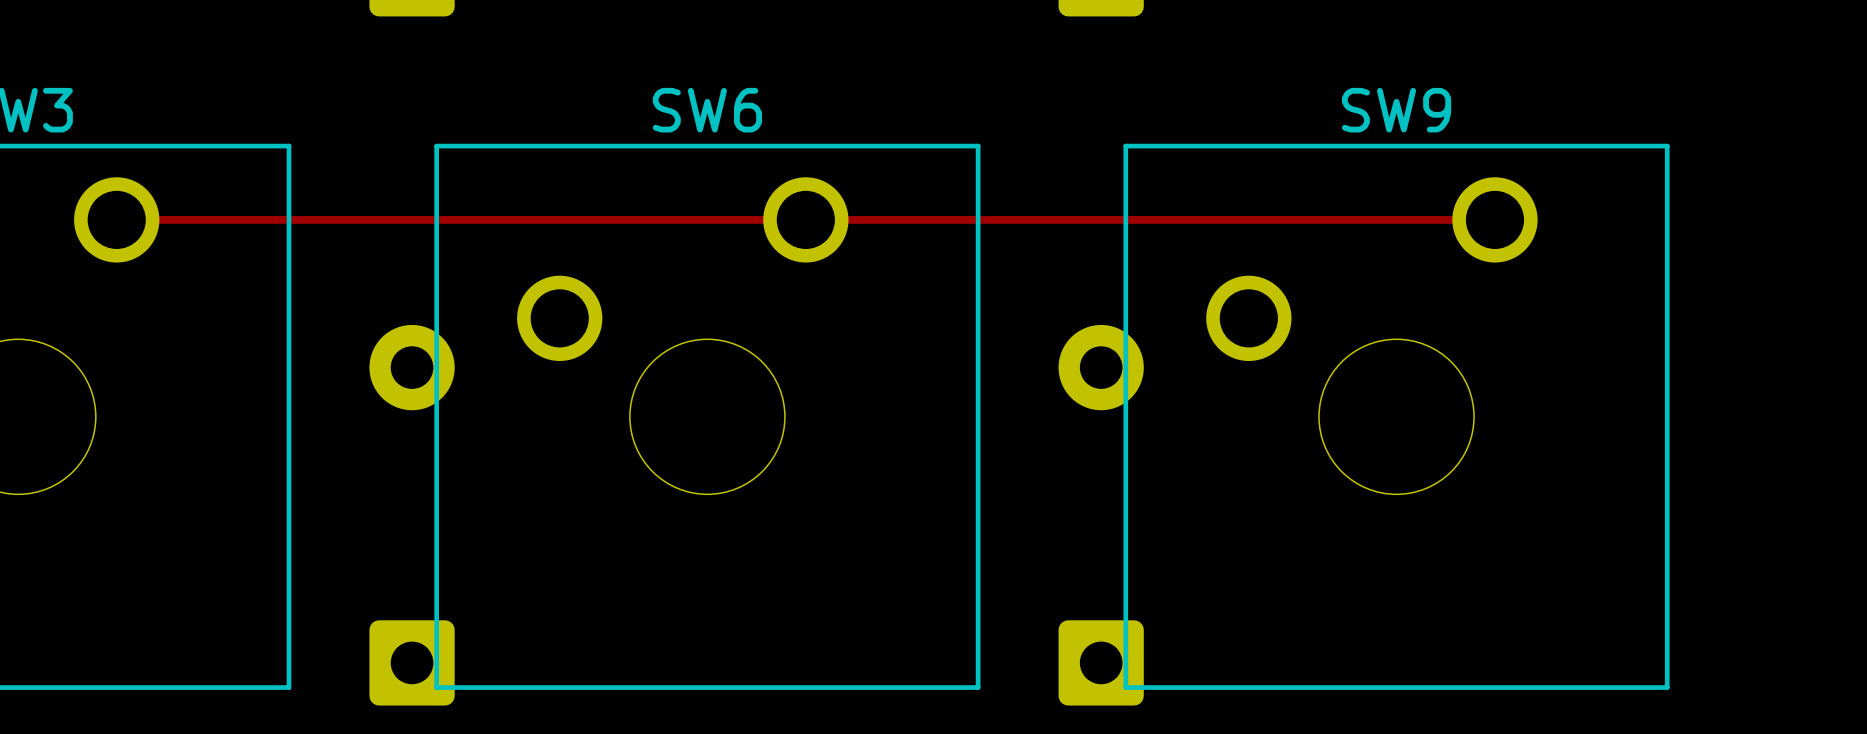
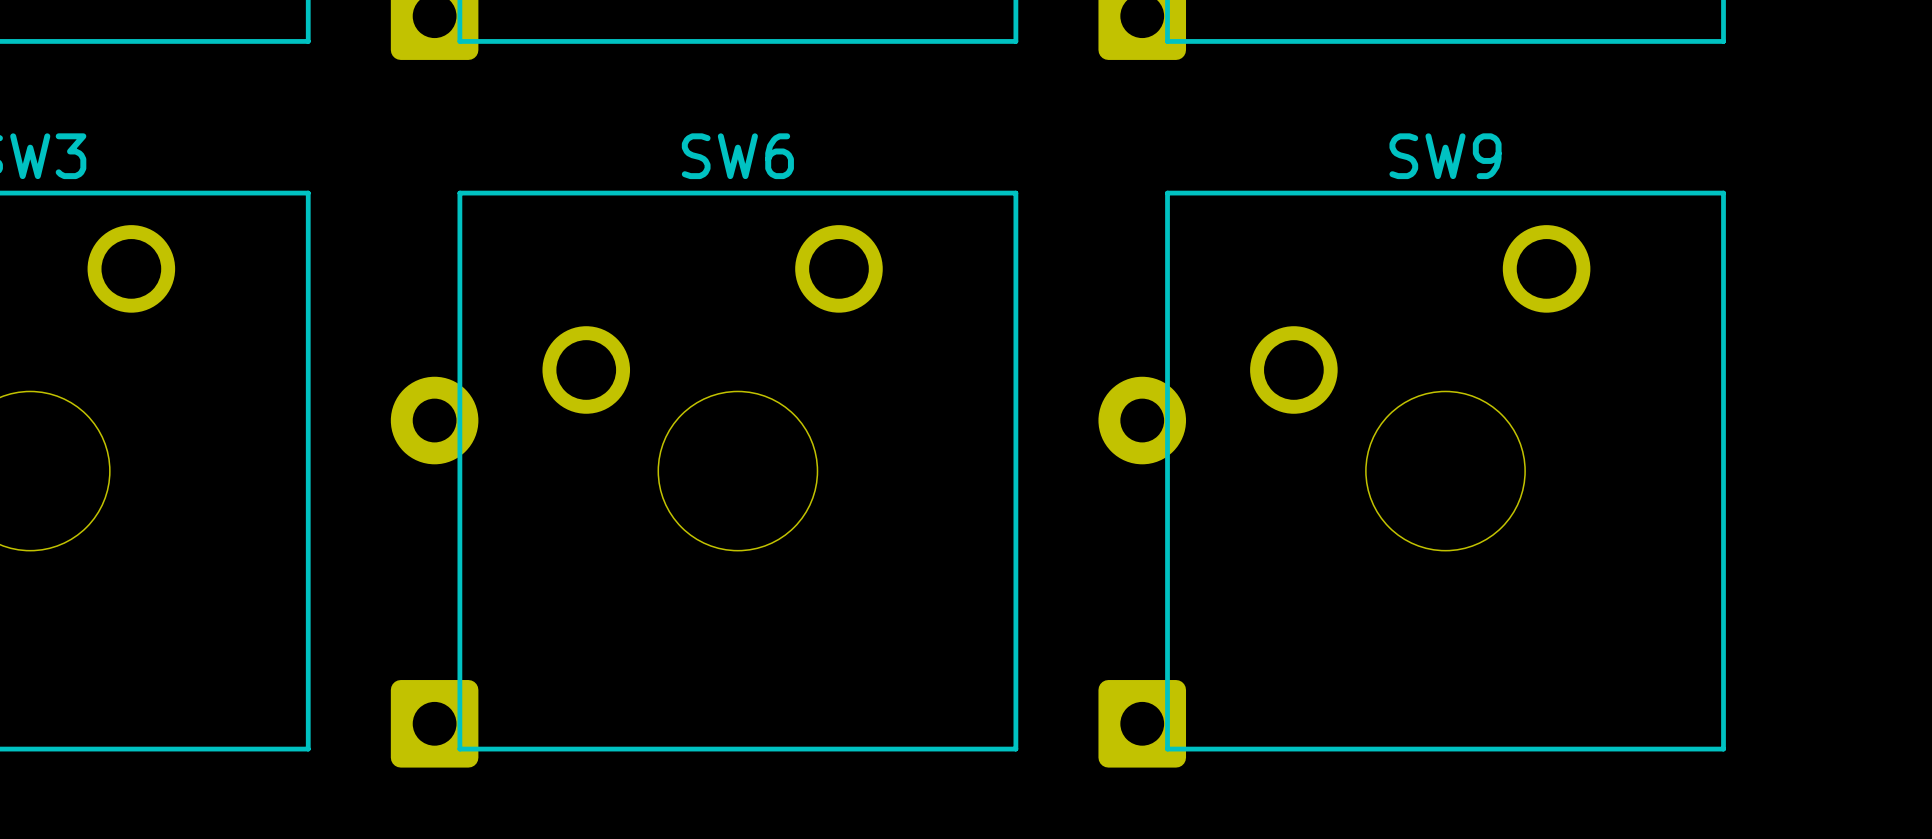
track: (116, 219) (1494, 219) -> none

